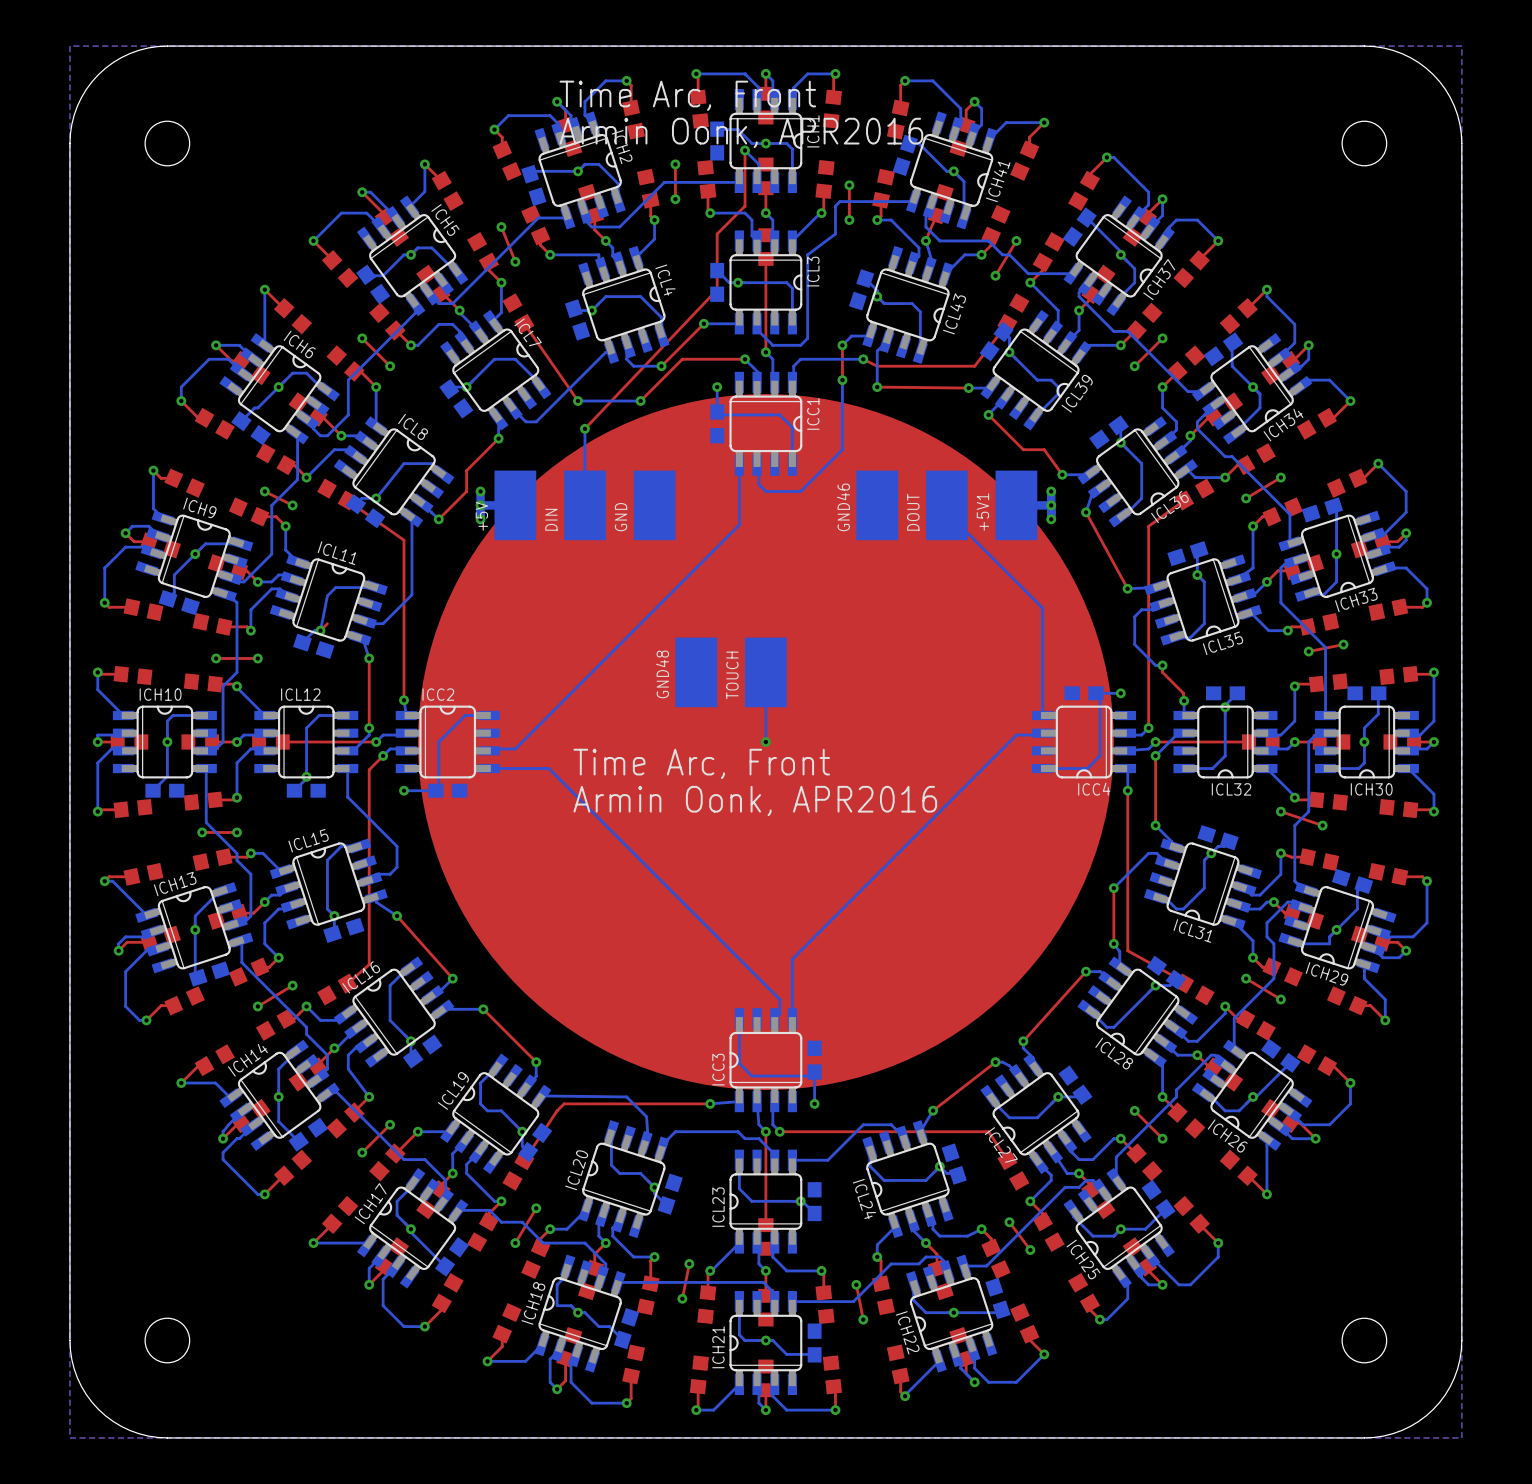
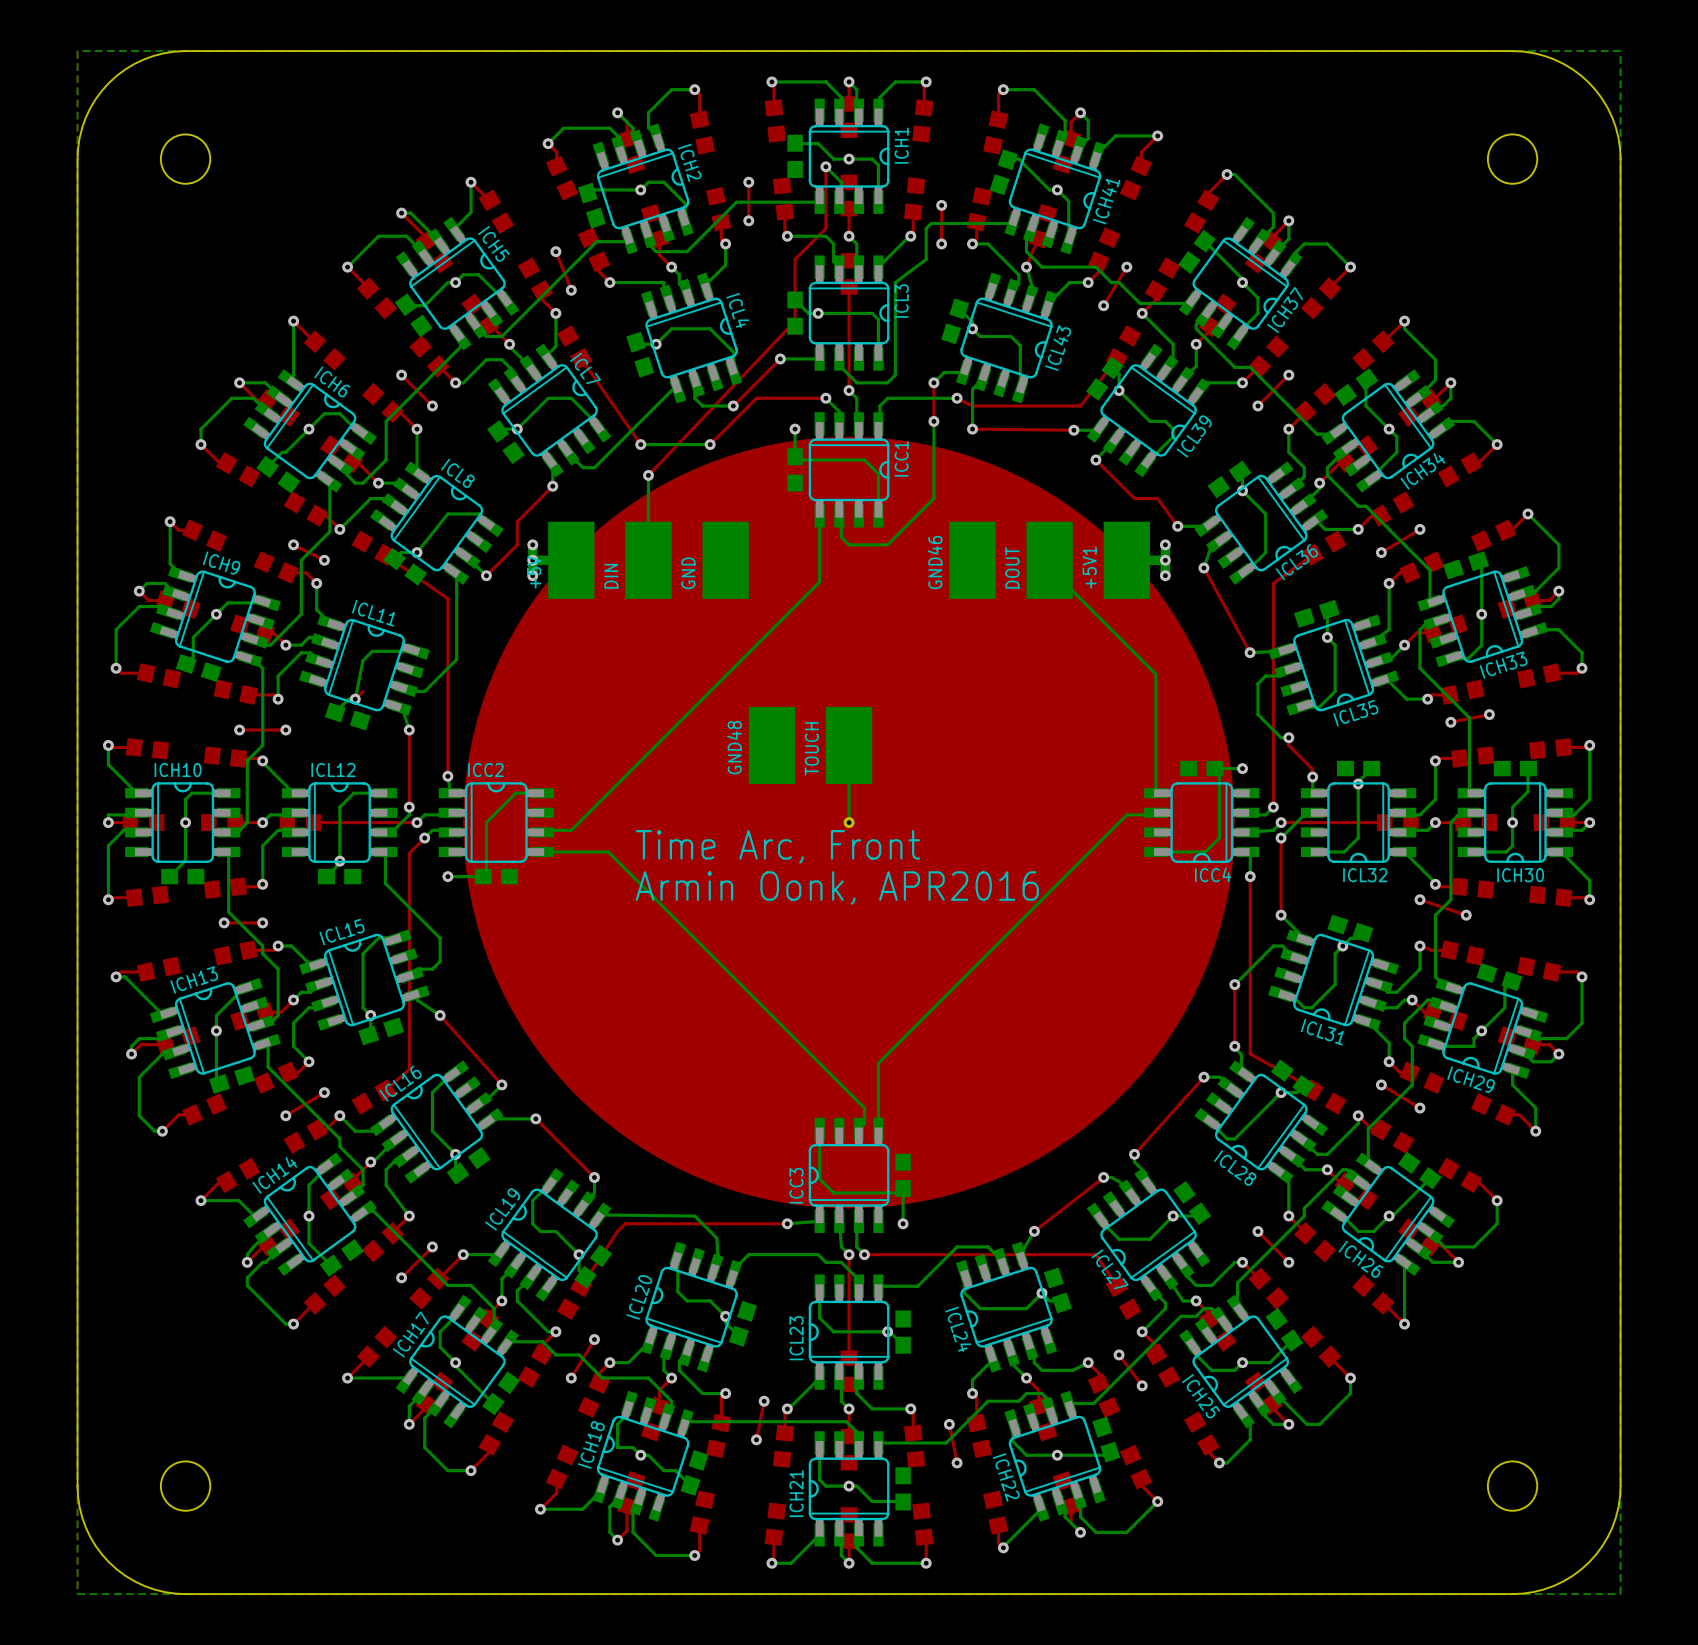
text: Time Arc, Front (687, 95) -> none
text: Armin Oonk, APR2016 (741, 132) -> none

